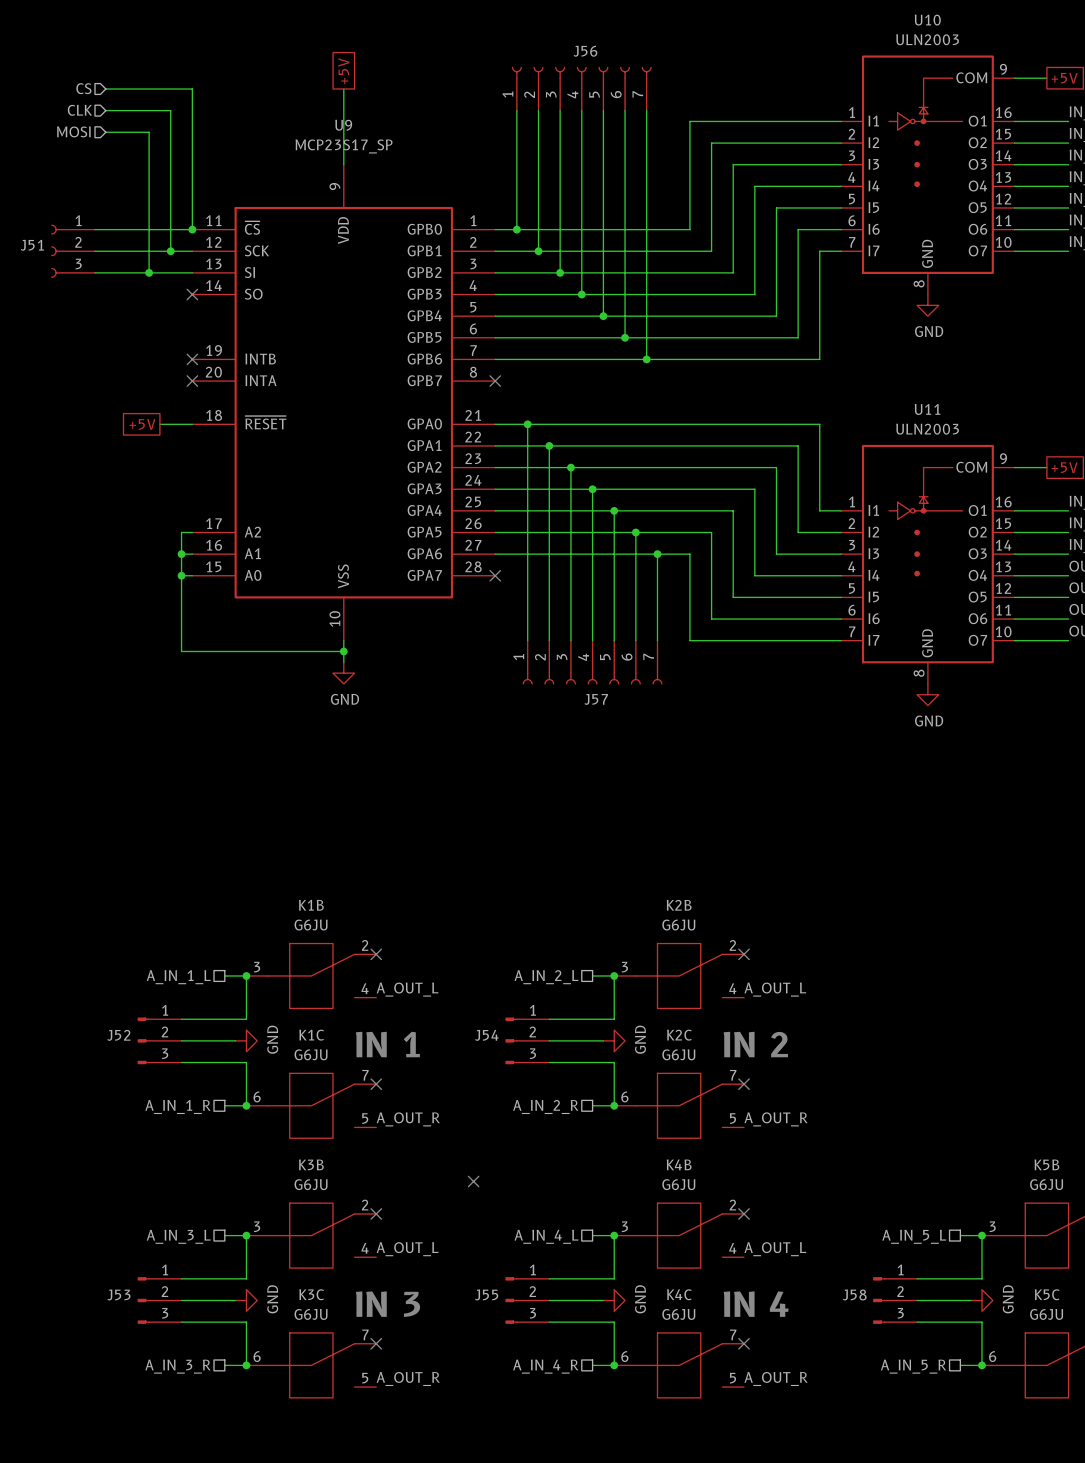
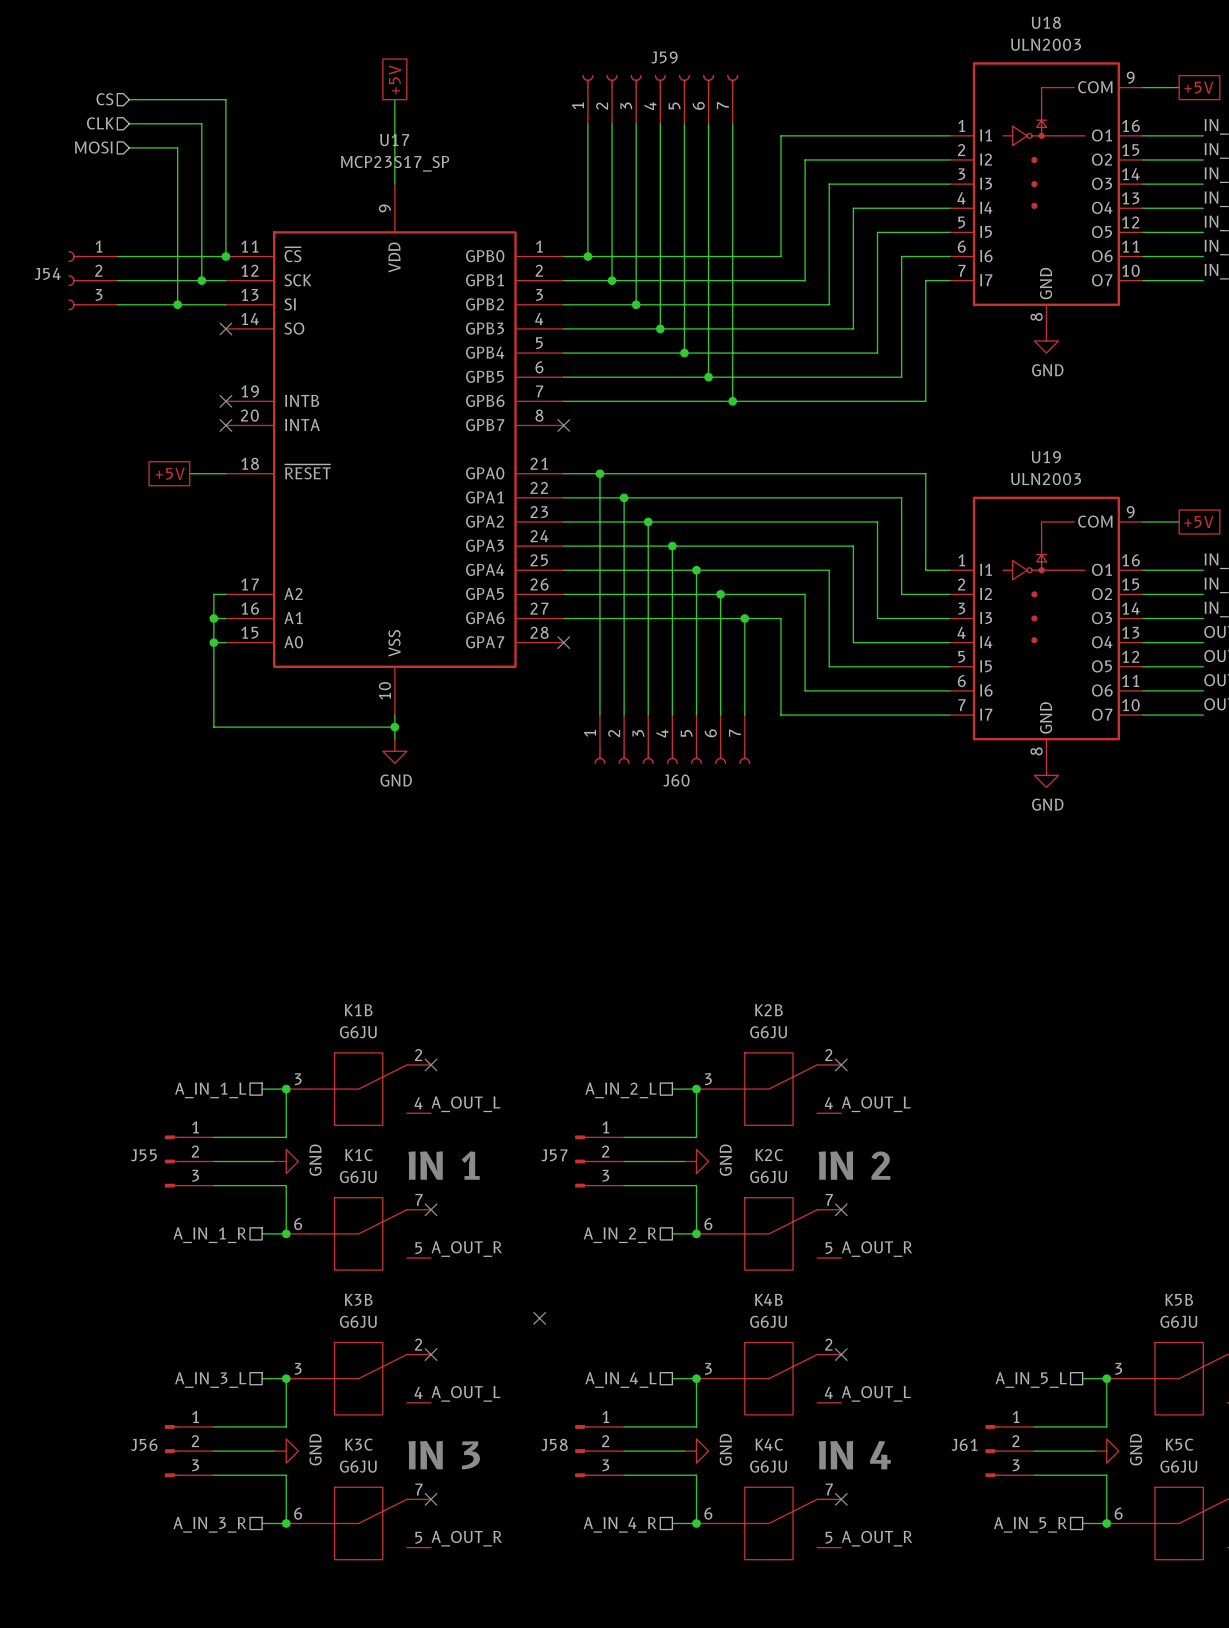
U10 name: U10 (927, 20) -> U18 (1046, 22)
J56 name: J56 (585, 51) -> J59 (664, 57)
U9 name: U9 (343, 125) -> U17 (394, 140)
J51 name: J51 (32, 245) -> J54 (47, 273)
U11 name: U11 (927, 409) -> U19 (1046, 457)
J57 name: J57 (596, 699) -> J60 (676, 780)
J52 name: J52 (118, 1035) -> J55 (143, 1155)
J54 name: J54 (486, 1035) -> J57 (554, 1155)
J53 name: J53 (118, 1294) -> J56 (144, 1444)
J55 name: J55 (486, 1294) -> J58 (554, 1444)
J58 name: J58 (854, 1294) -> J61 (964, 1444)

